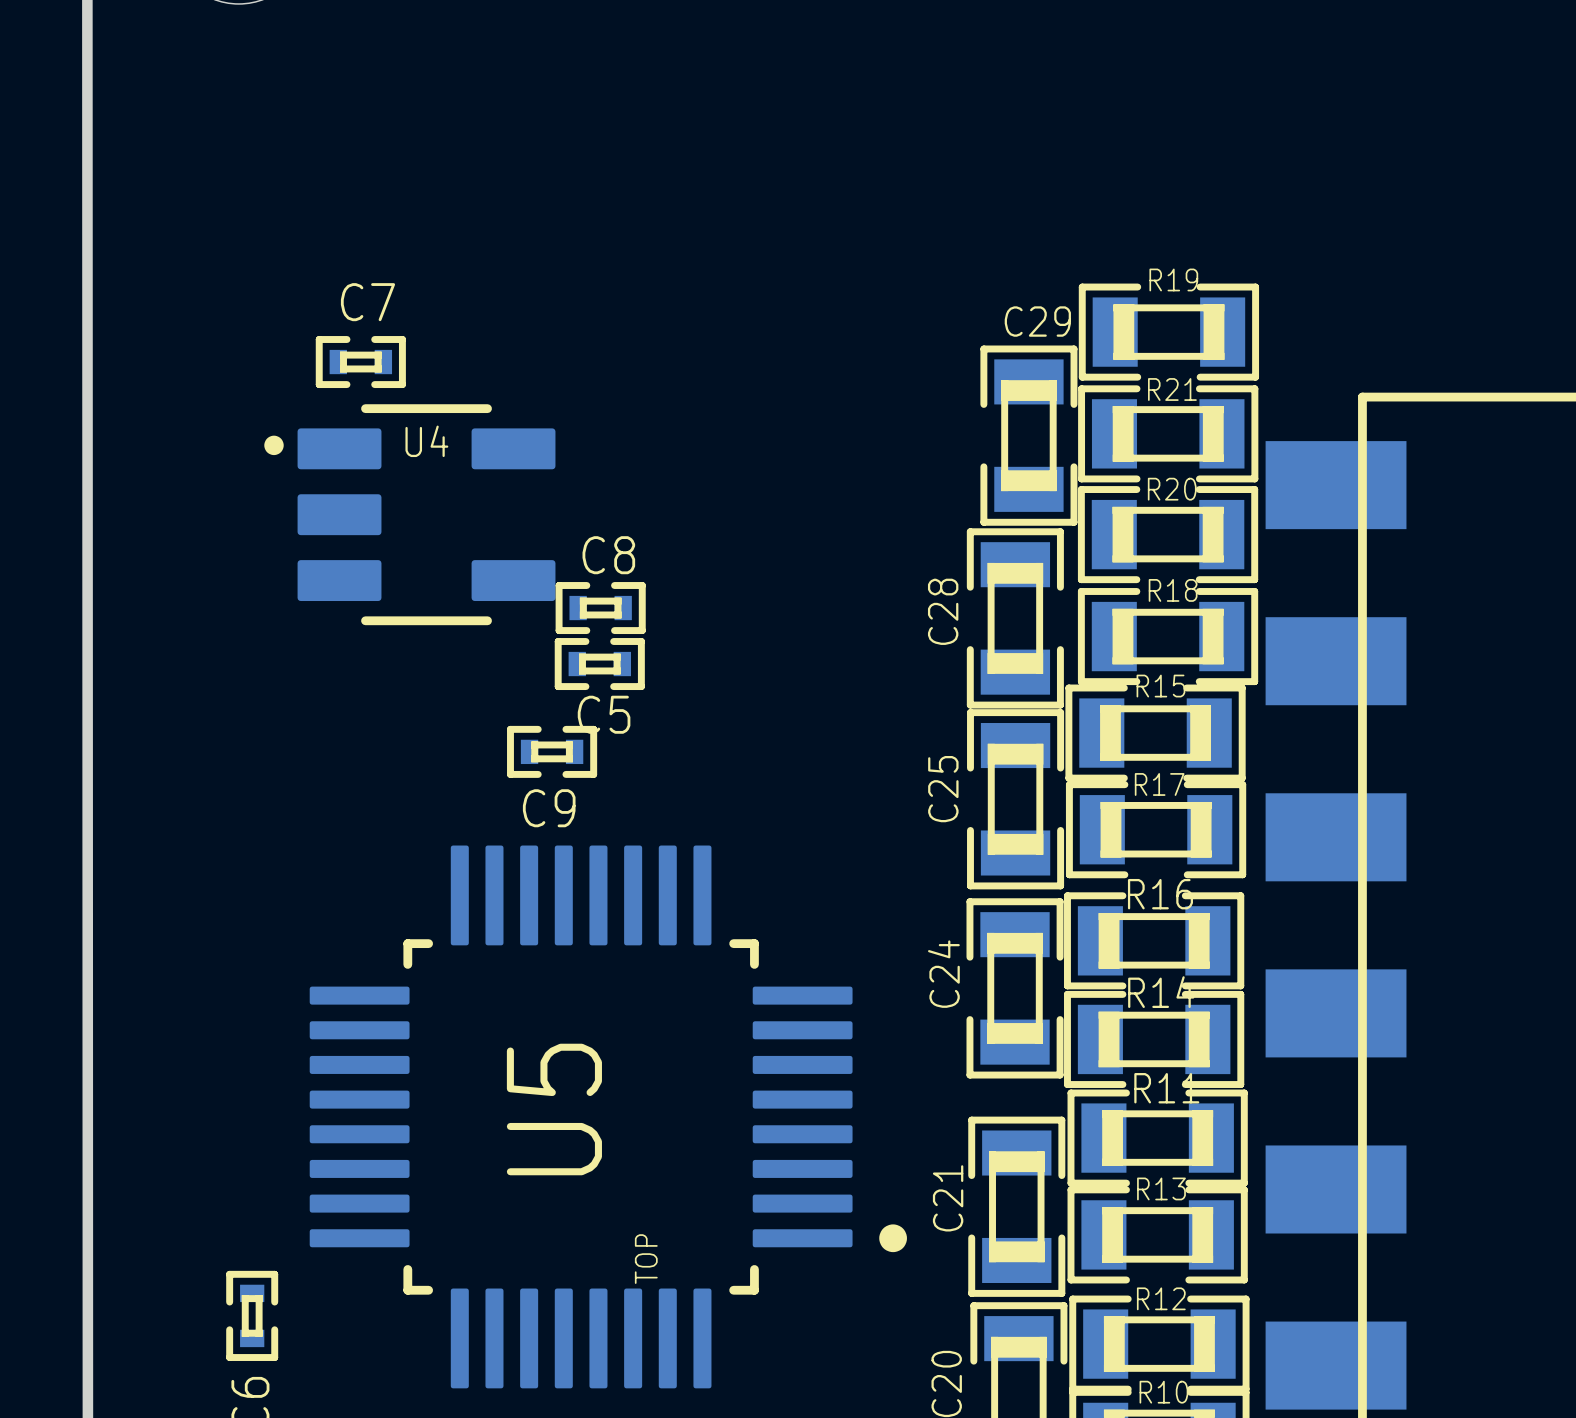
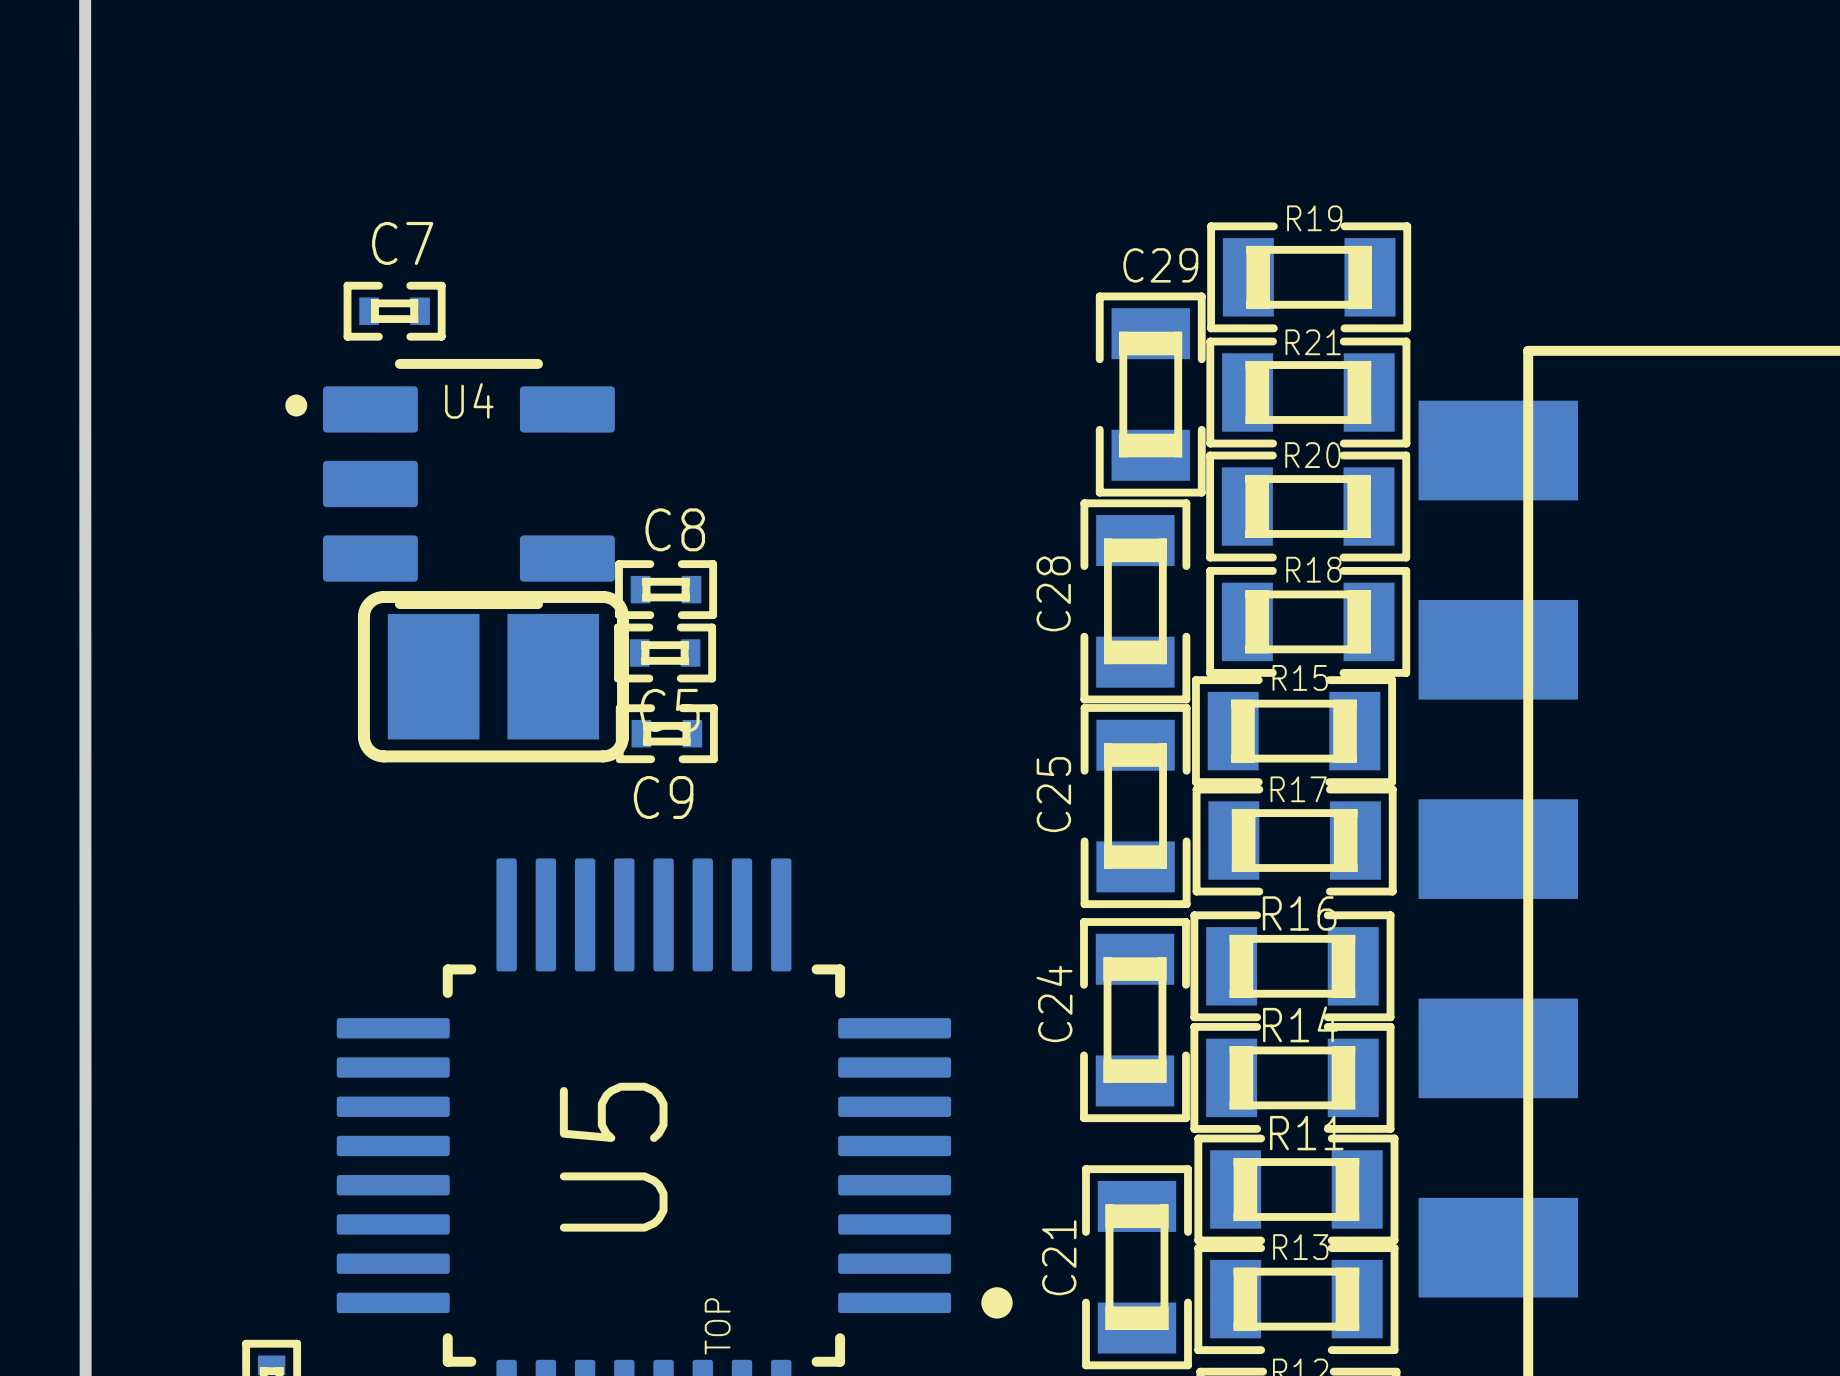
part: none -> (493, 676)
C9 position: (552, 751) -> (666, 733)

